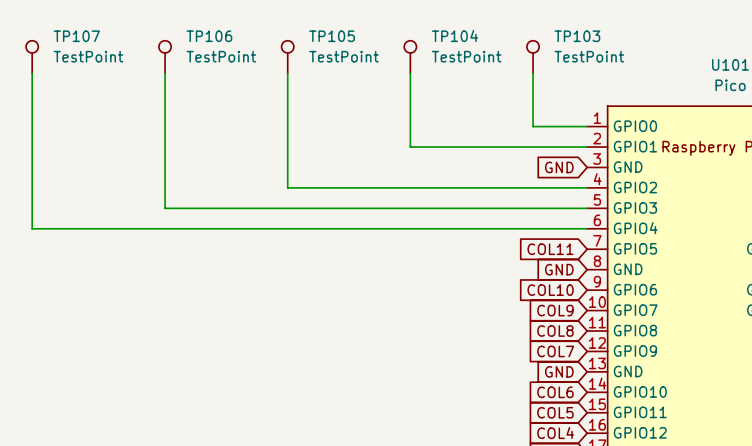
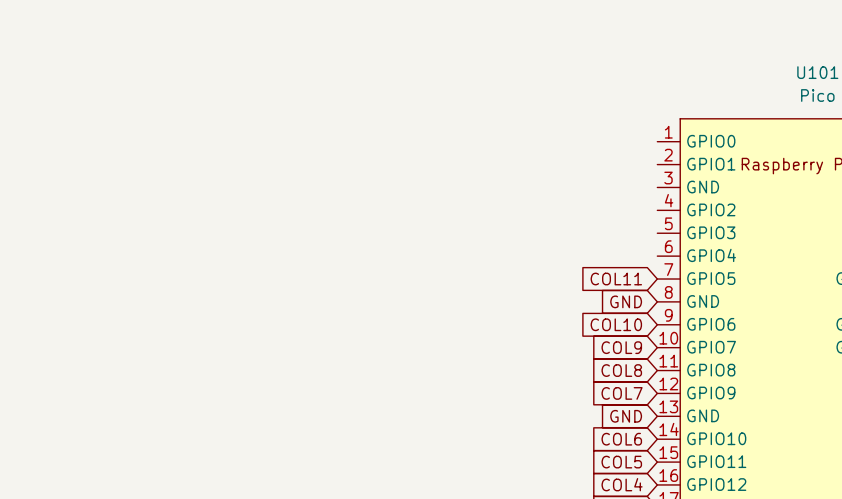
TP107: TestPoint (32, 57) -> none
TP106: TestPoint (165, 57) -> none
TP105: TestPoint (287, 57) -> none
TP104: TestPoint (410, 57) -> none
TP103: TestPoint (533, 57) -> none
wire: (32, 73) (32, 228) (587, 228) -> none
wire: (165, 73) (165, 208) (587, 208) -> none
wire: (287, 73) (287, 187) (587, 187) -> none
wire: (410, 73) (410, 147) (587, 147) -> none
wire: (533, 73) (533, 126) (587, 126) -> none
global label: GND (559, 167) -> none

